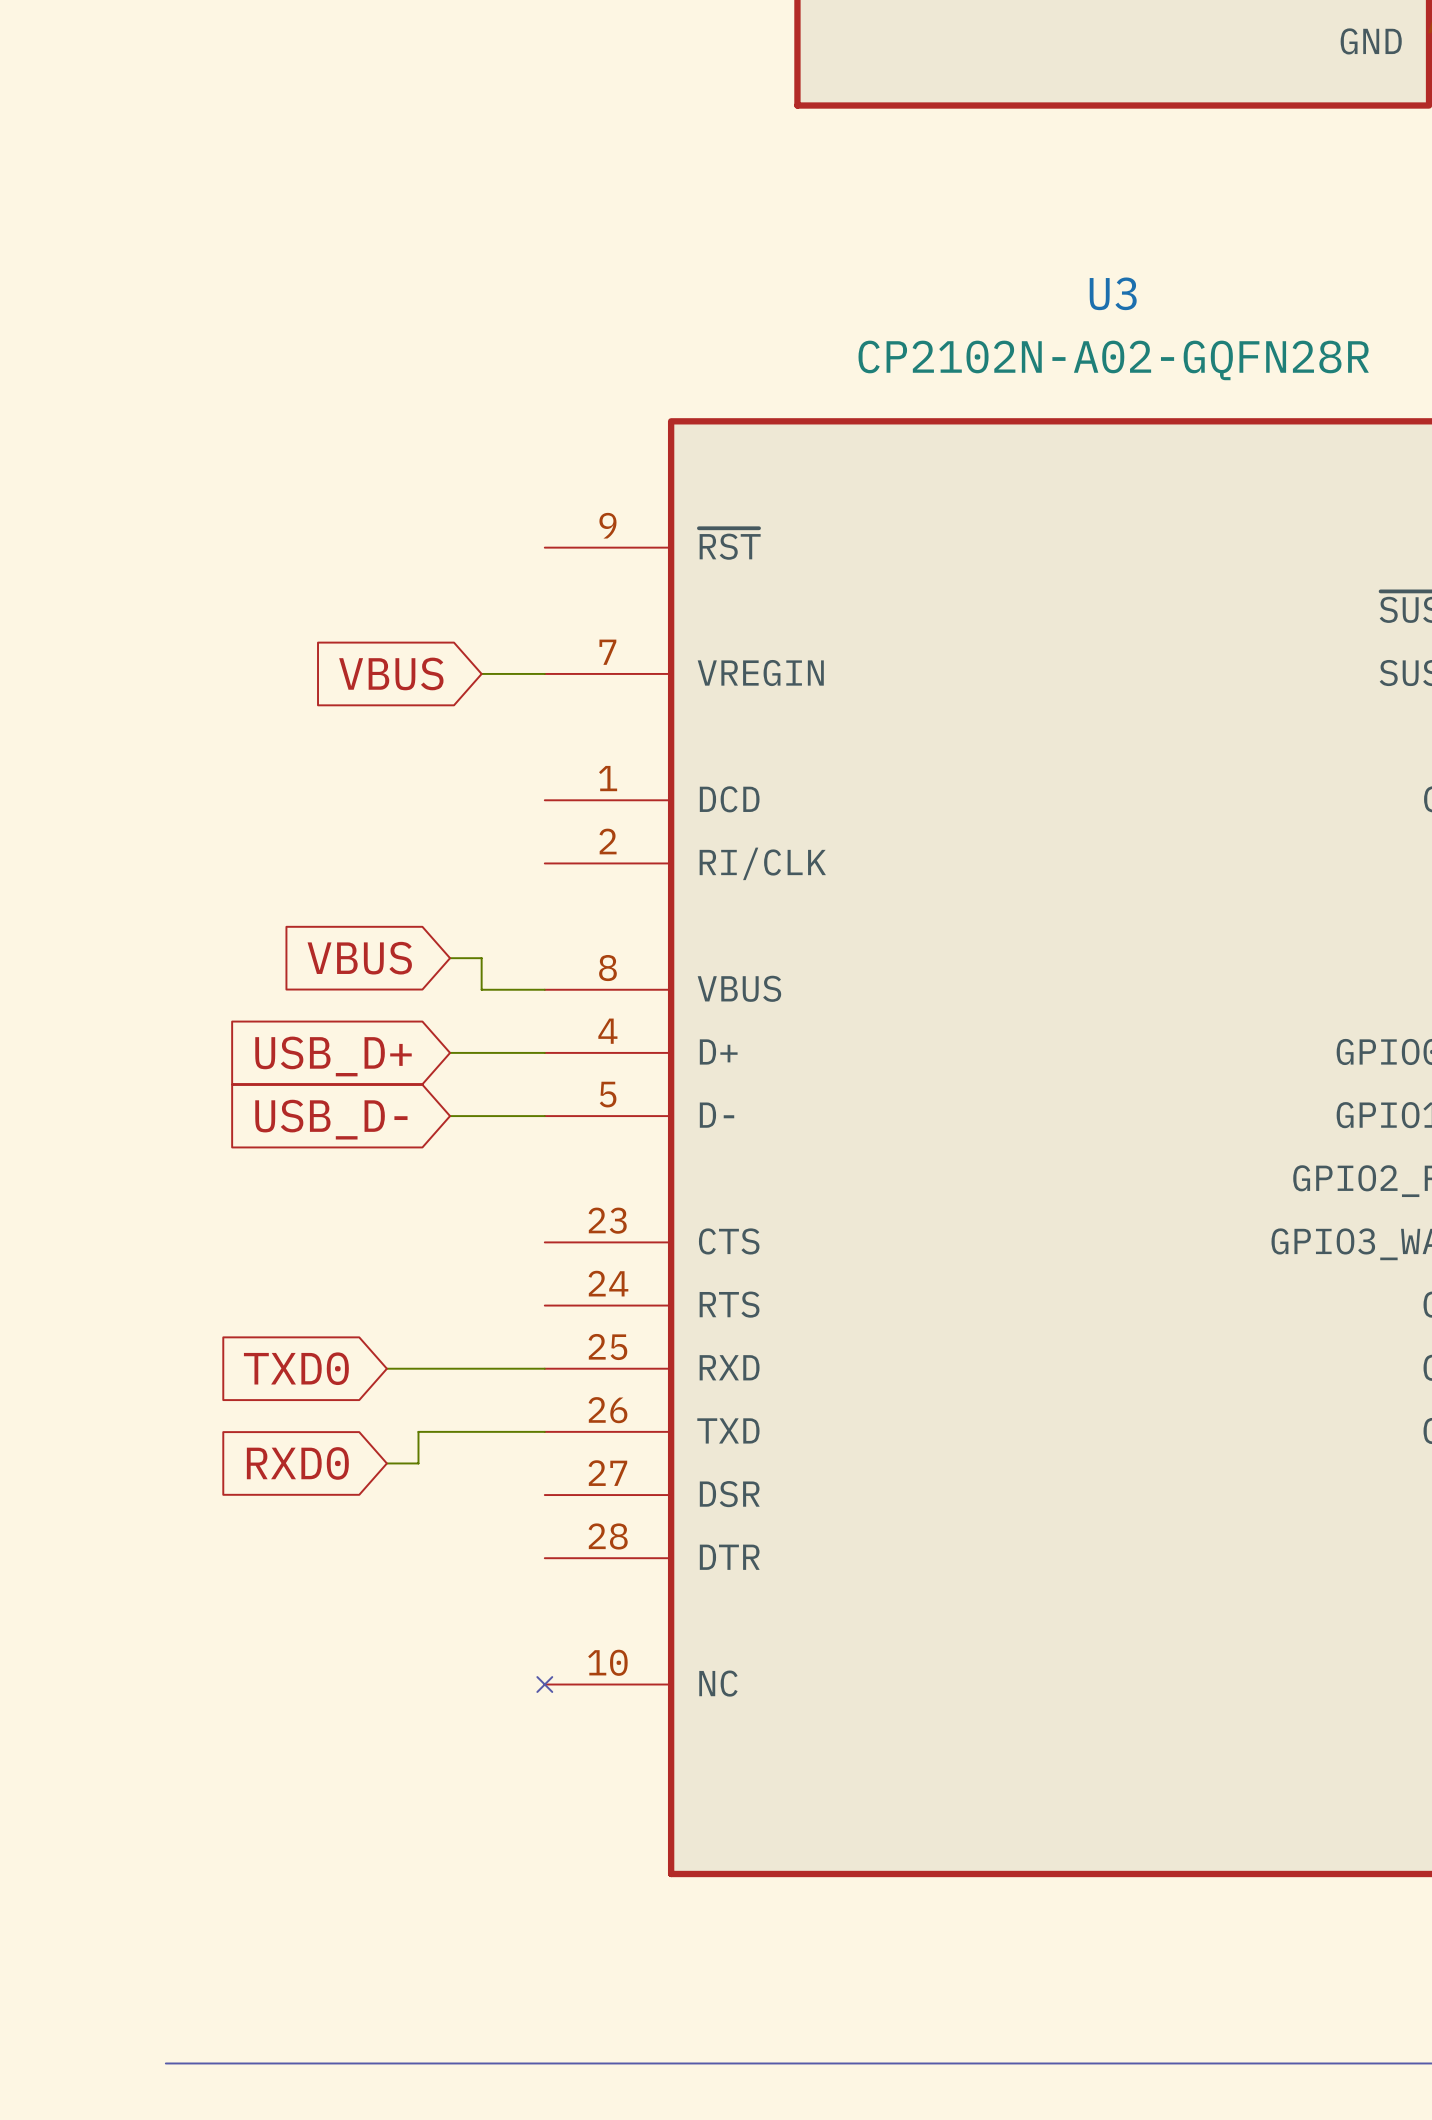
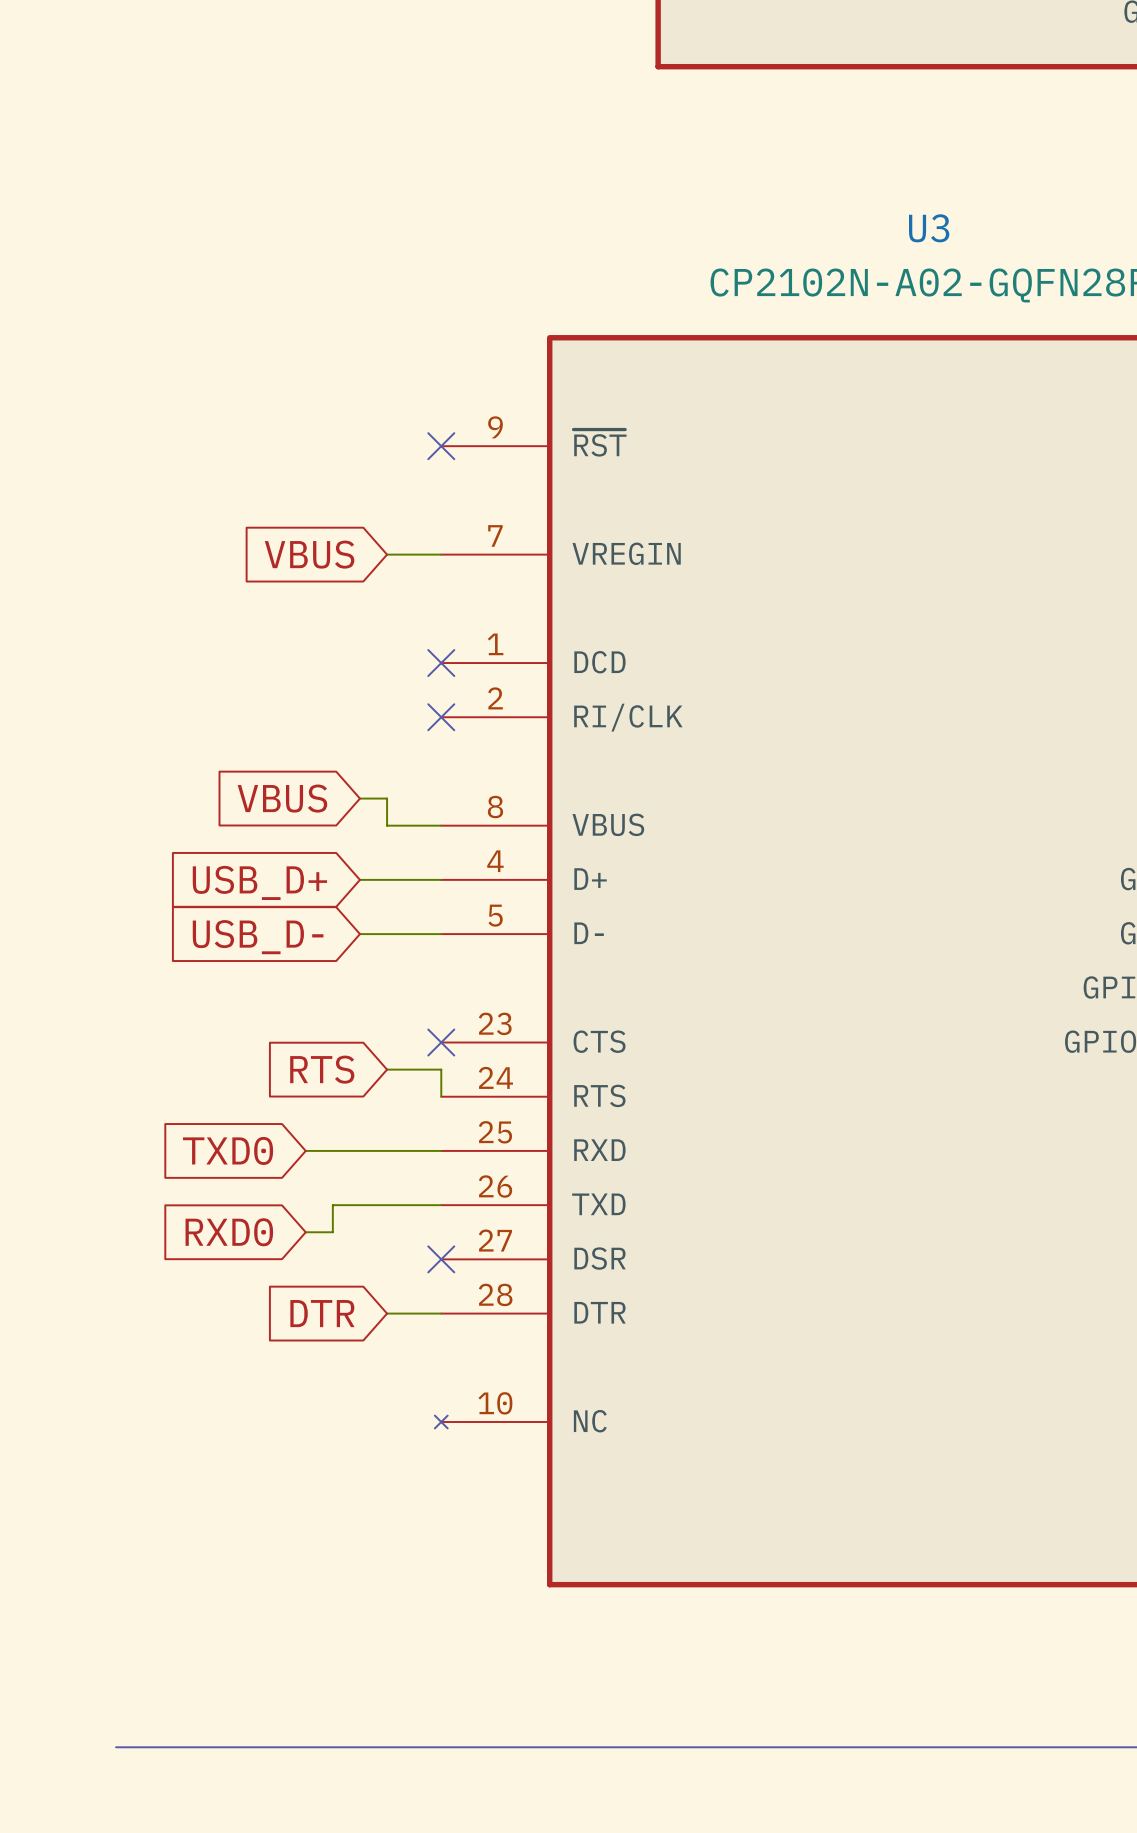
no-connect mark: none -> (441, 446)
no-connect mark: none -> (441, 663)
no-connect mark: none -> (441, 717)
no-connect mark: none -> (441, 1042)
global label: none -> RTS (322, 1069)
wire: none -> (387, 1069) (441, 1069) (441, 1096)
no-connect mark: none -> (441, 1259)
global label: none -> DTR (322, 1313)
wire: none -> (387, 1313) (441, 1313)

